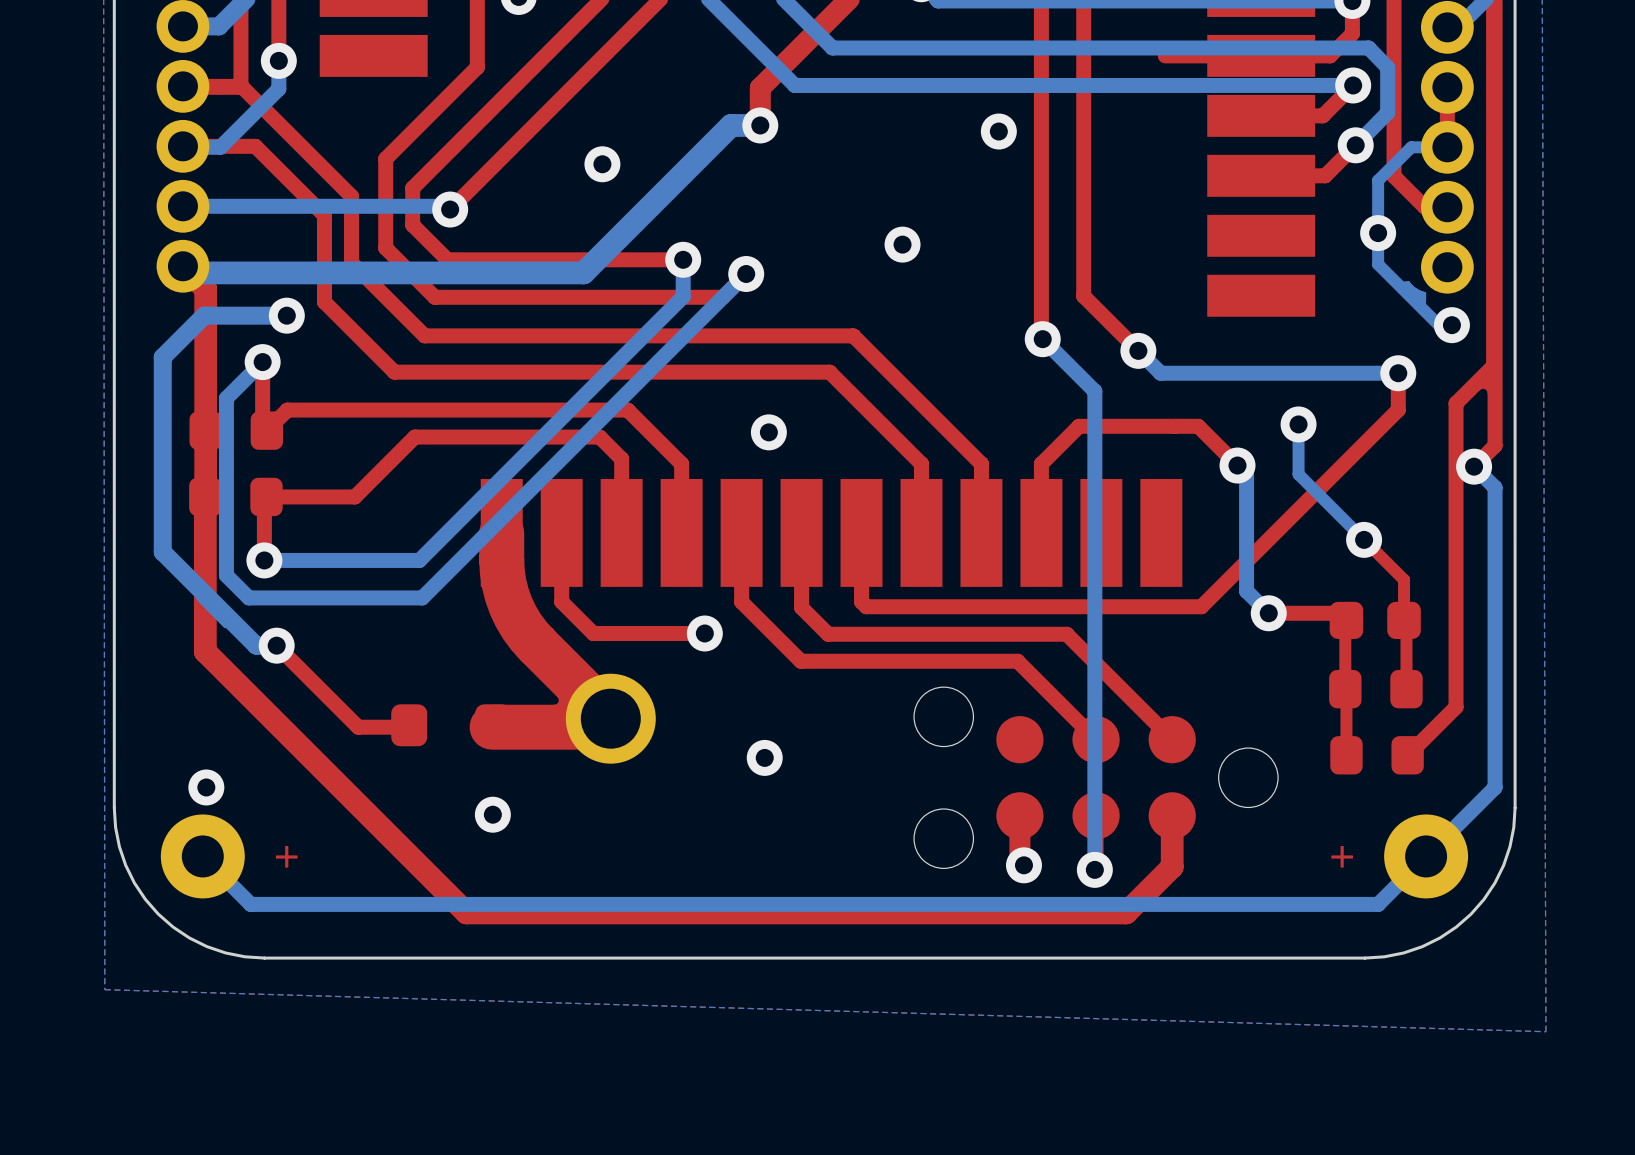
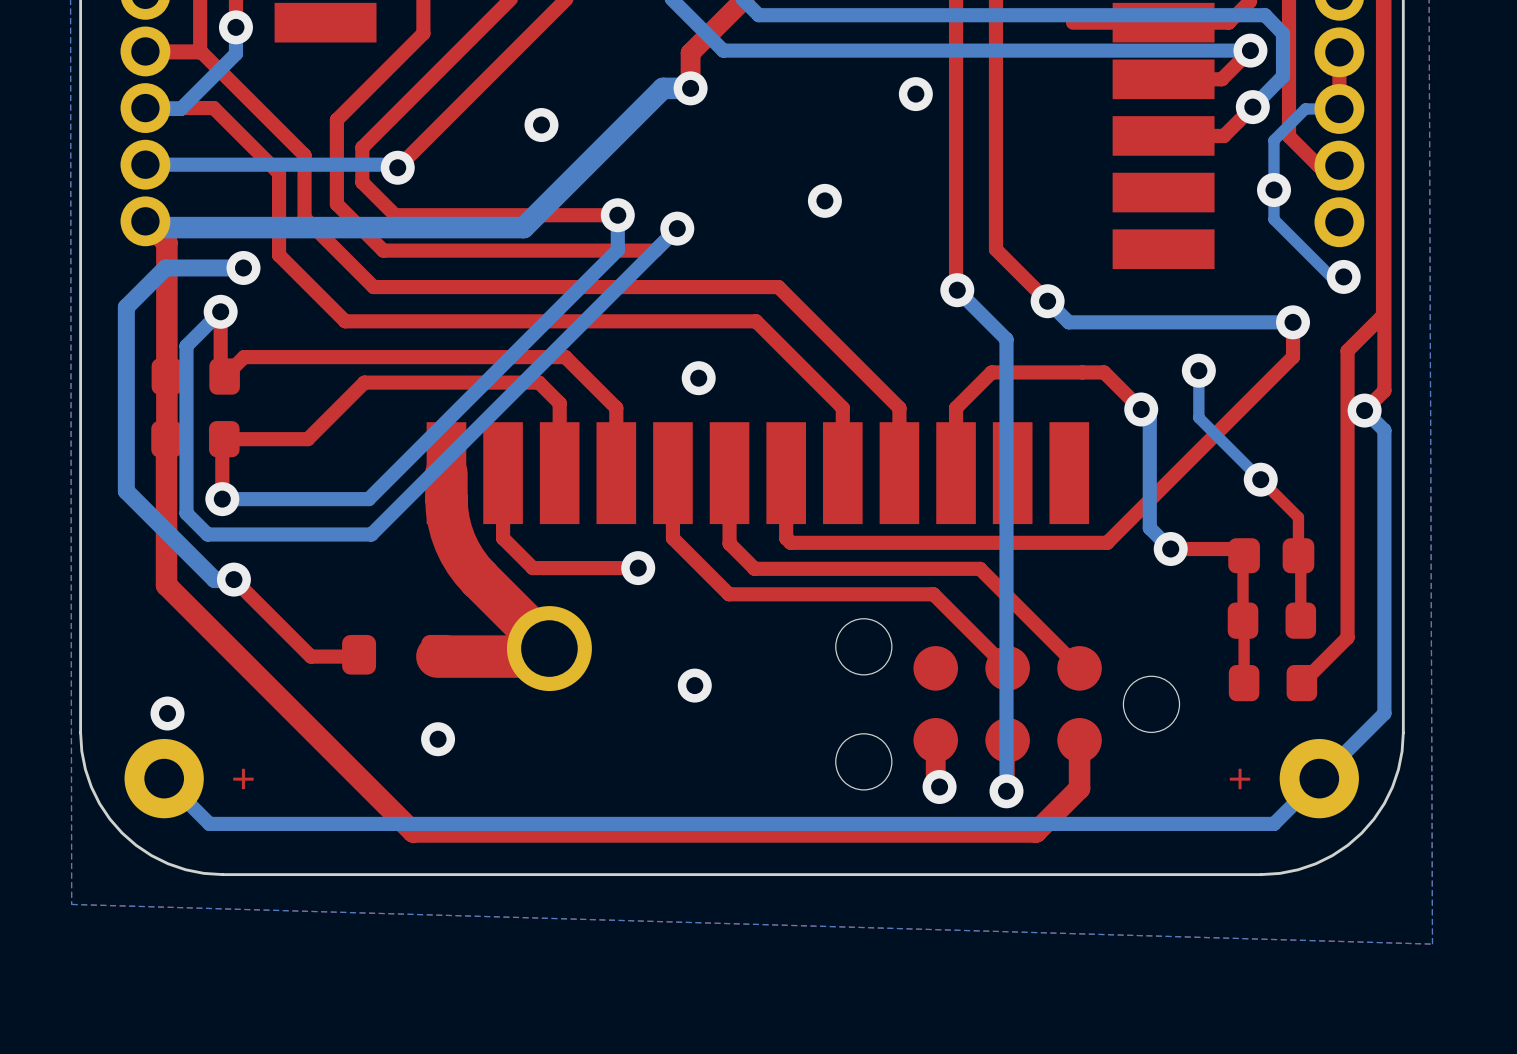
drawing: [1403, 281, 1427, 304] -> none
drawing: [1478, 381, 1489, 395] -> none
drawing: [196, 598, 226, 629] -> none
drawing: [553, 696, 566, 706] -> none

